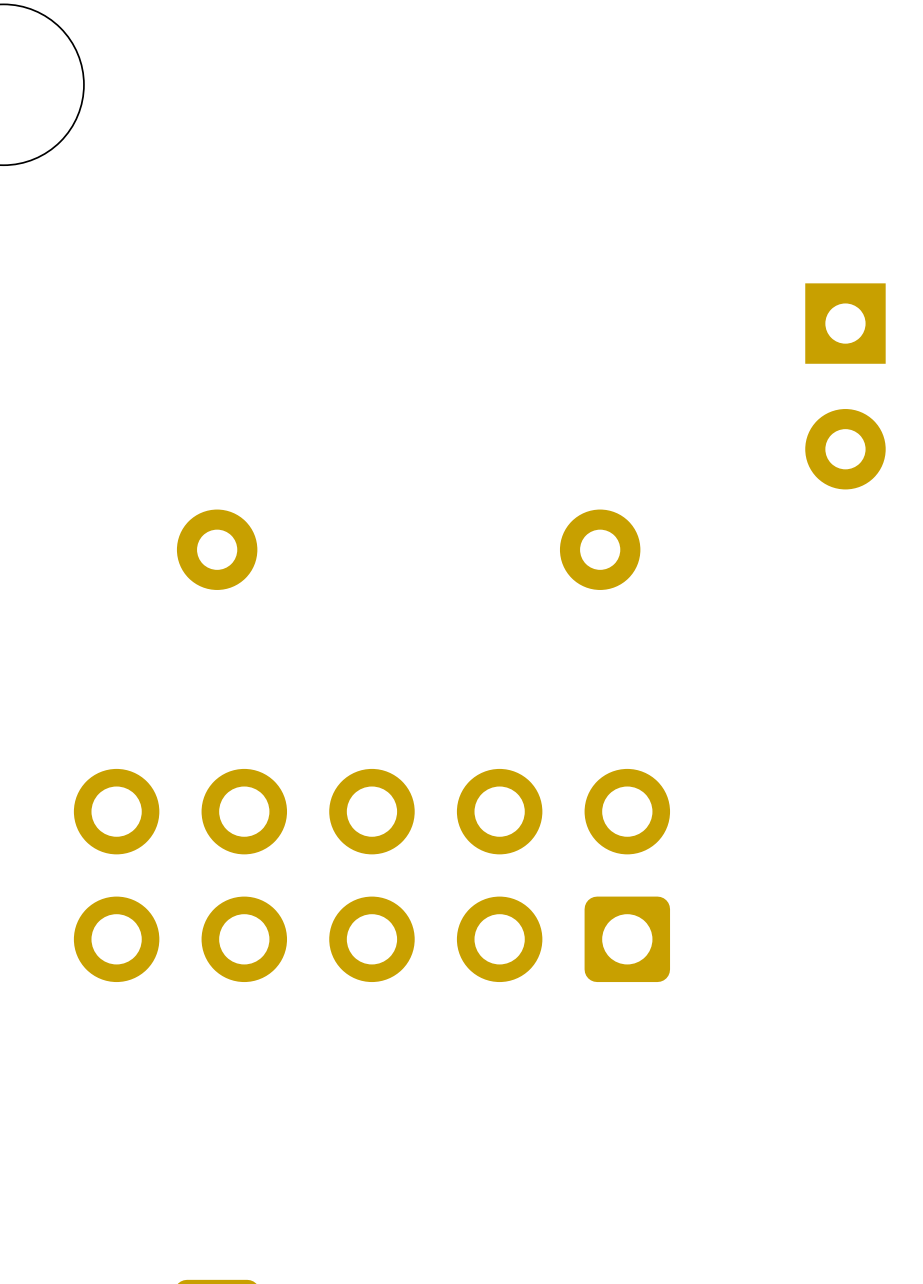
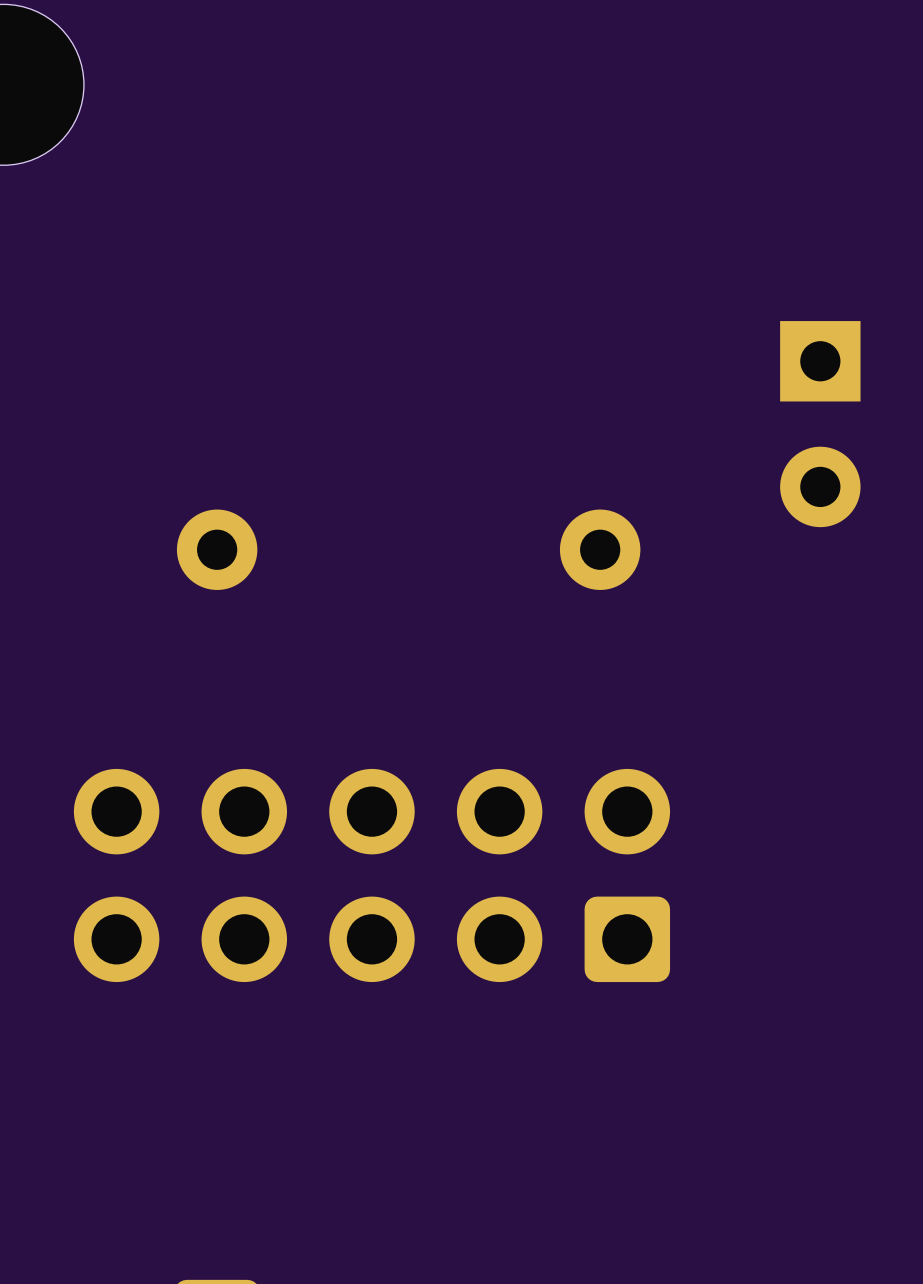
part position: (845, 386) -> (820, 424)

